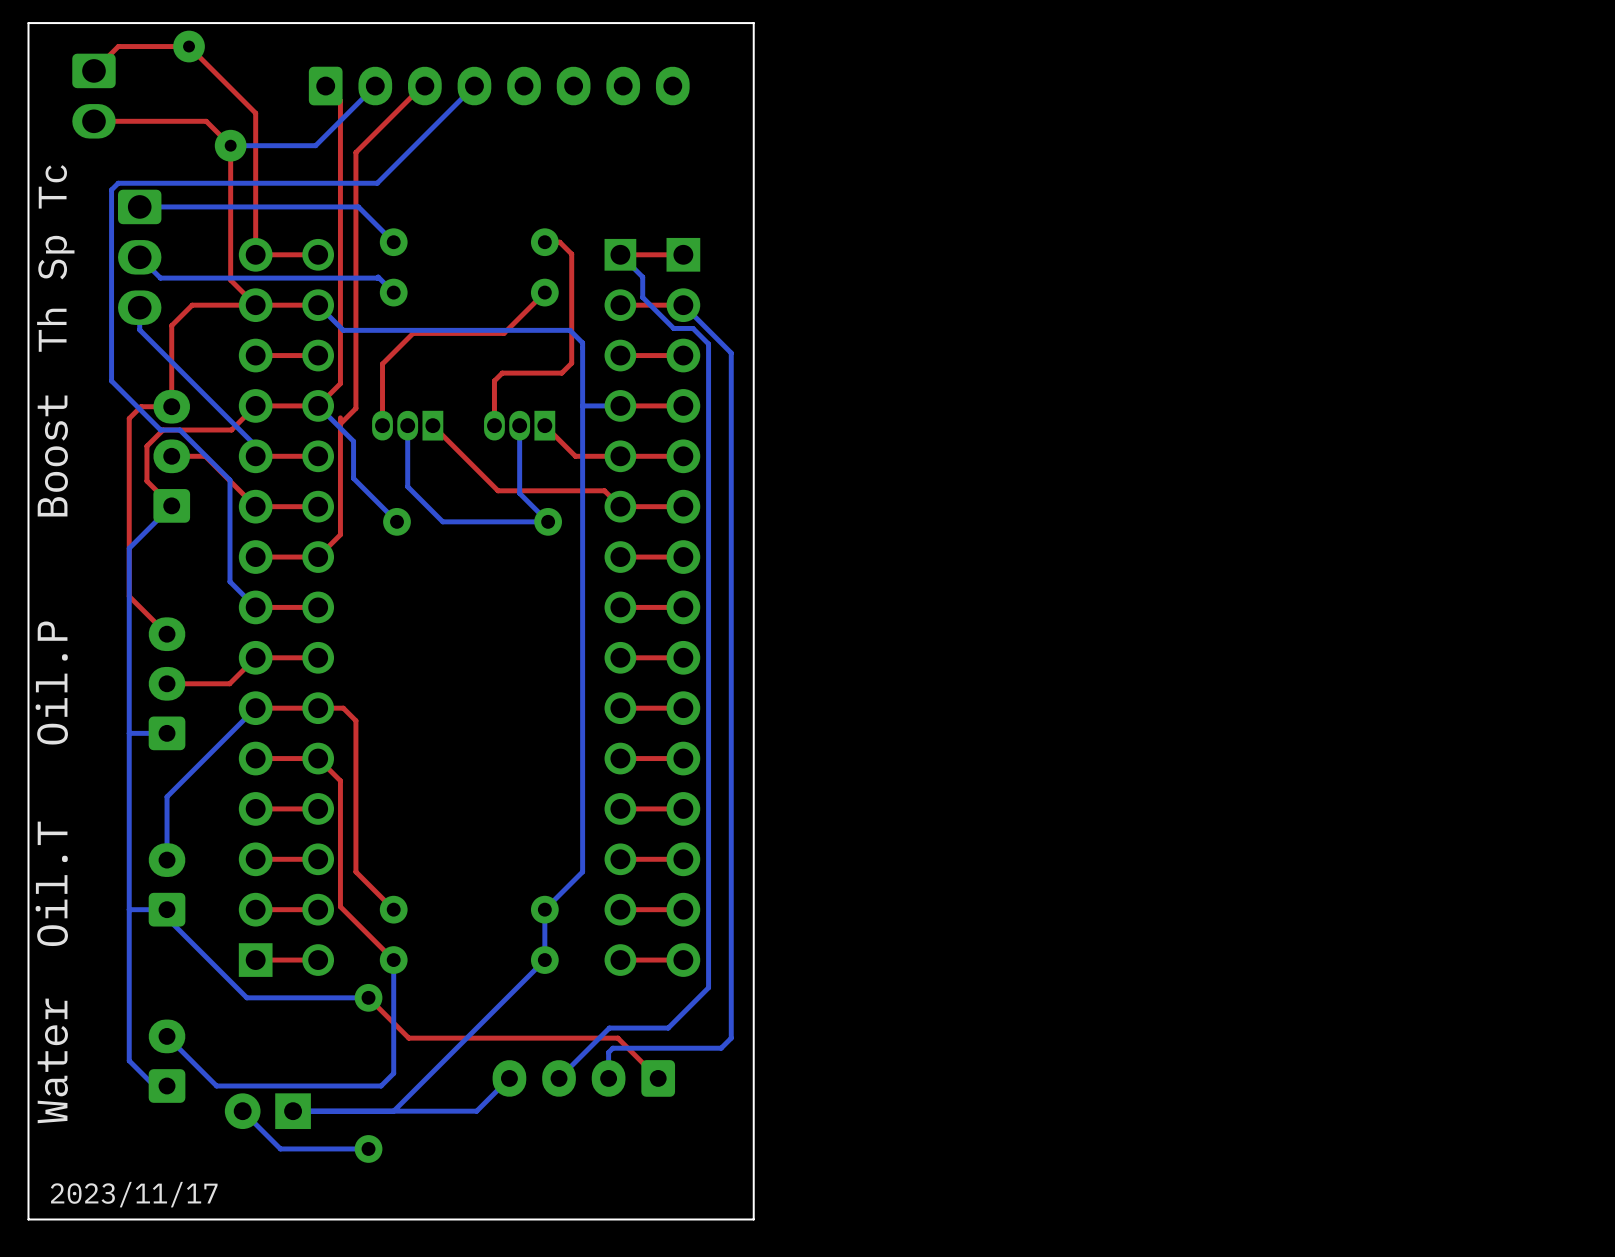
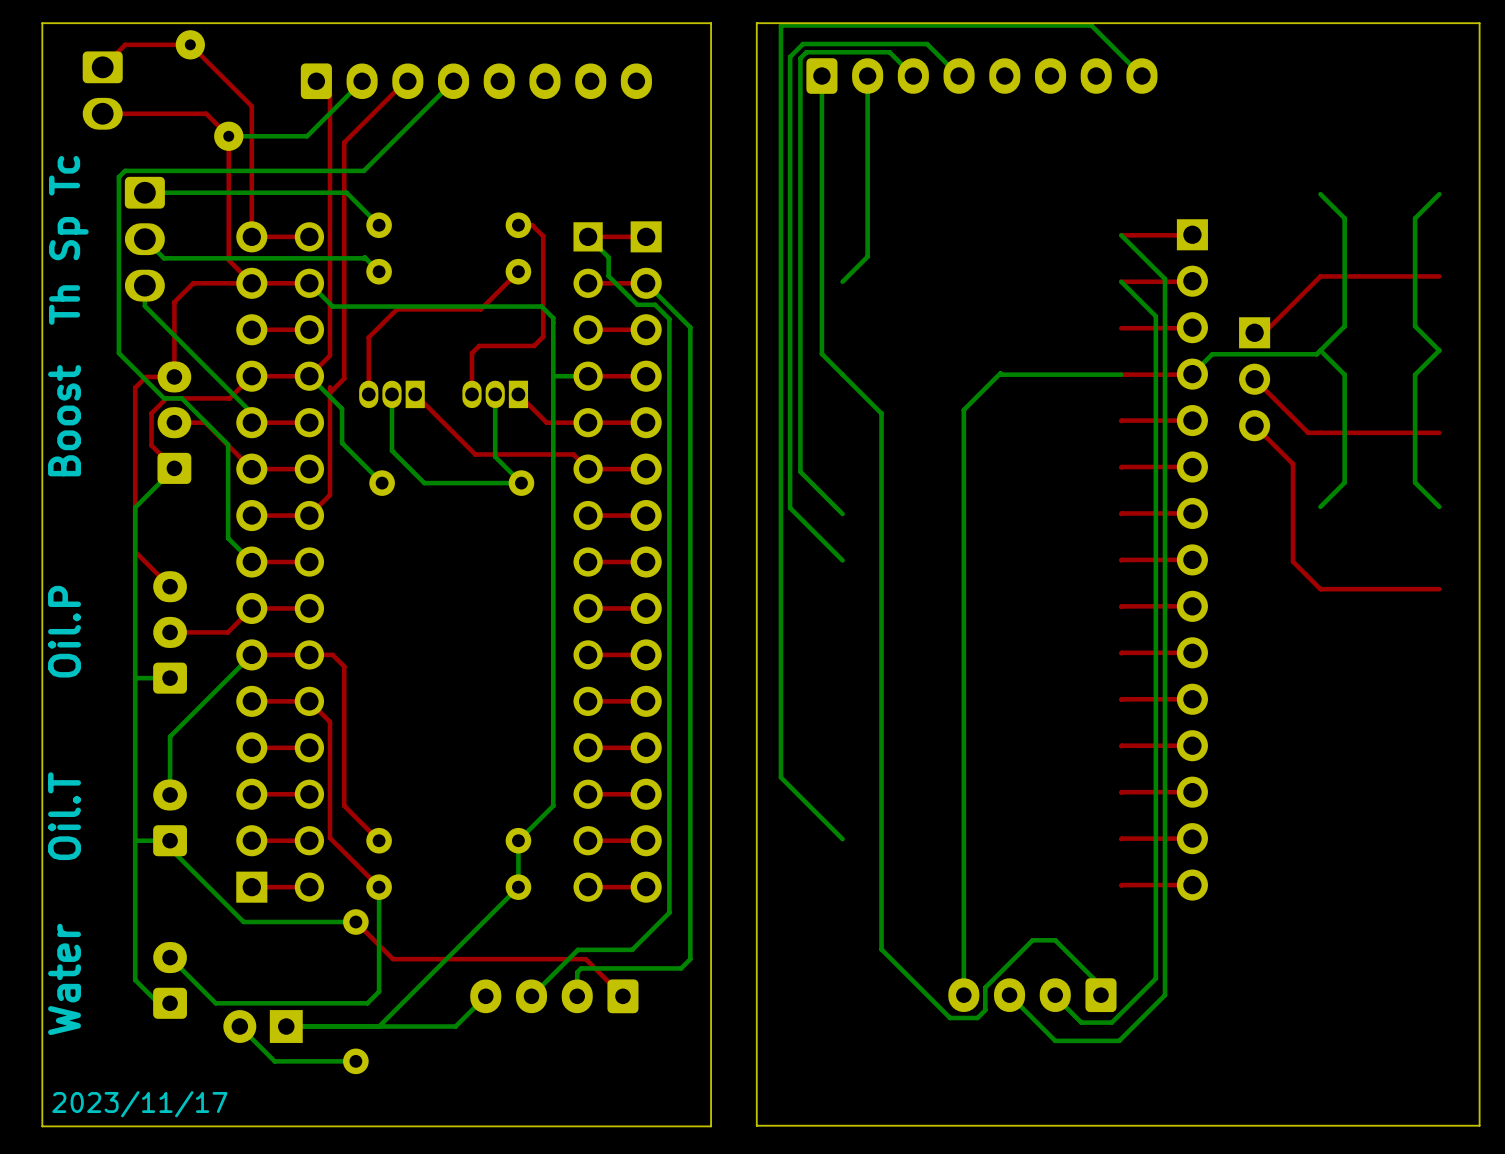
board edge: none -> (1479, 23) (756, 23) (756, 1125) (1479, 1125) (1479, 23)
bottom track: none -> (821, 76) (821, 353) (881, 413) (881, 949) (950, 1018) (977, 1018) (985, 1010) (985, 987) (1032, 940) (1055, 940) (1100, 986) (1100, 995)
bottom track: none -> (867, 76) (867, 256) (842, 281)
bottom track: none -> (913, 76) (889, 52) (806, 52) (800, 58) (800, 471) (842, 514)
bottom track: none -> (959, 76) (927, 44) (803, 44) (790, 56) (790, 507) (842, 560)
part: none -> (981, 76)
bottom track: none -> (1141, 76) (1091, 25) (780, 25) (780, 777) (842, 839)
bottom track: none -> (1320, 194) (1344, 218) (1344, 326) (1316, 354) (1212, 354) (1192, 374)
bottom track: none -> (1439, 194) (1415, 218) (1415, 326) (1439, 350) (1415, 374) (1415, 482) (1439, 506)
top track: none -> (1192, 234) (1121, 235)
bottom track: none -> (1121, 235) (1164, 279) (1164, 995) (1119, 1040) (1055, 1040) (1009, 995)
top track: none -> (1439, 276) (1320, 276) (1264, 332) (1254, 332)
top track: none -> (1192, 281) (1121, 281)
bottom track: none -> (1121, 281) (1155, 316) (1155, 978) (1111, 1022) (1081, 1022) (1055, 995)
top track: none -> (1192, 327) (1121, 328)
bottom track: none -> (1320, 350) (1344, 374) (1344, 482) (1320, 506)
top track: none -> (1192, 374) (1121, 374)
bottom track: none -> (1121, 374) (1000, 373) (963, 409) (963, 995)
top track: none -> (1254, 379) (1308, 432) (1439, 432)
part: none -> (1254, 379)
top track: none -> (1192, 420) (1121, 421)
top track: none -> (1254, 425) (1293, 464) (1293, 561) (1320, 589) (1439, 589)
top track: none -> (1192, 467) (1121, 467)
top track: none -> (1192, 513) (1121, 514)
top track: none -> (1192, 559) (1121, 560)
part: none -> (1192, 559)
top track: none -> (1192, 606) (1121, 606)
top track: none -> (1192, 652) (1121, 653)
top track: none -> (1192, 699) (1121, 699)
top track: none -> (1192, 745) (1121, 746)
top track: none -> (1192, 792) (1121, 792)
top track: none -> (1192, 838) (1121, 839)
top track: none -> (1192, 885) (1121, 885)
part: none -> (1032, 995)

